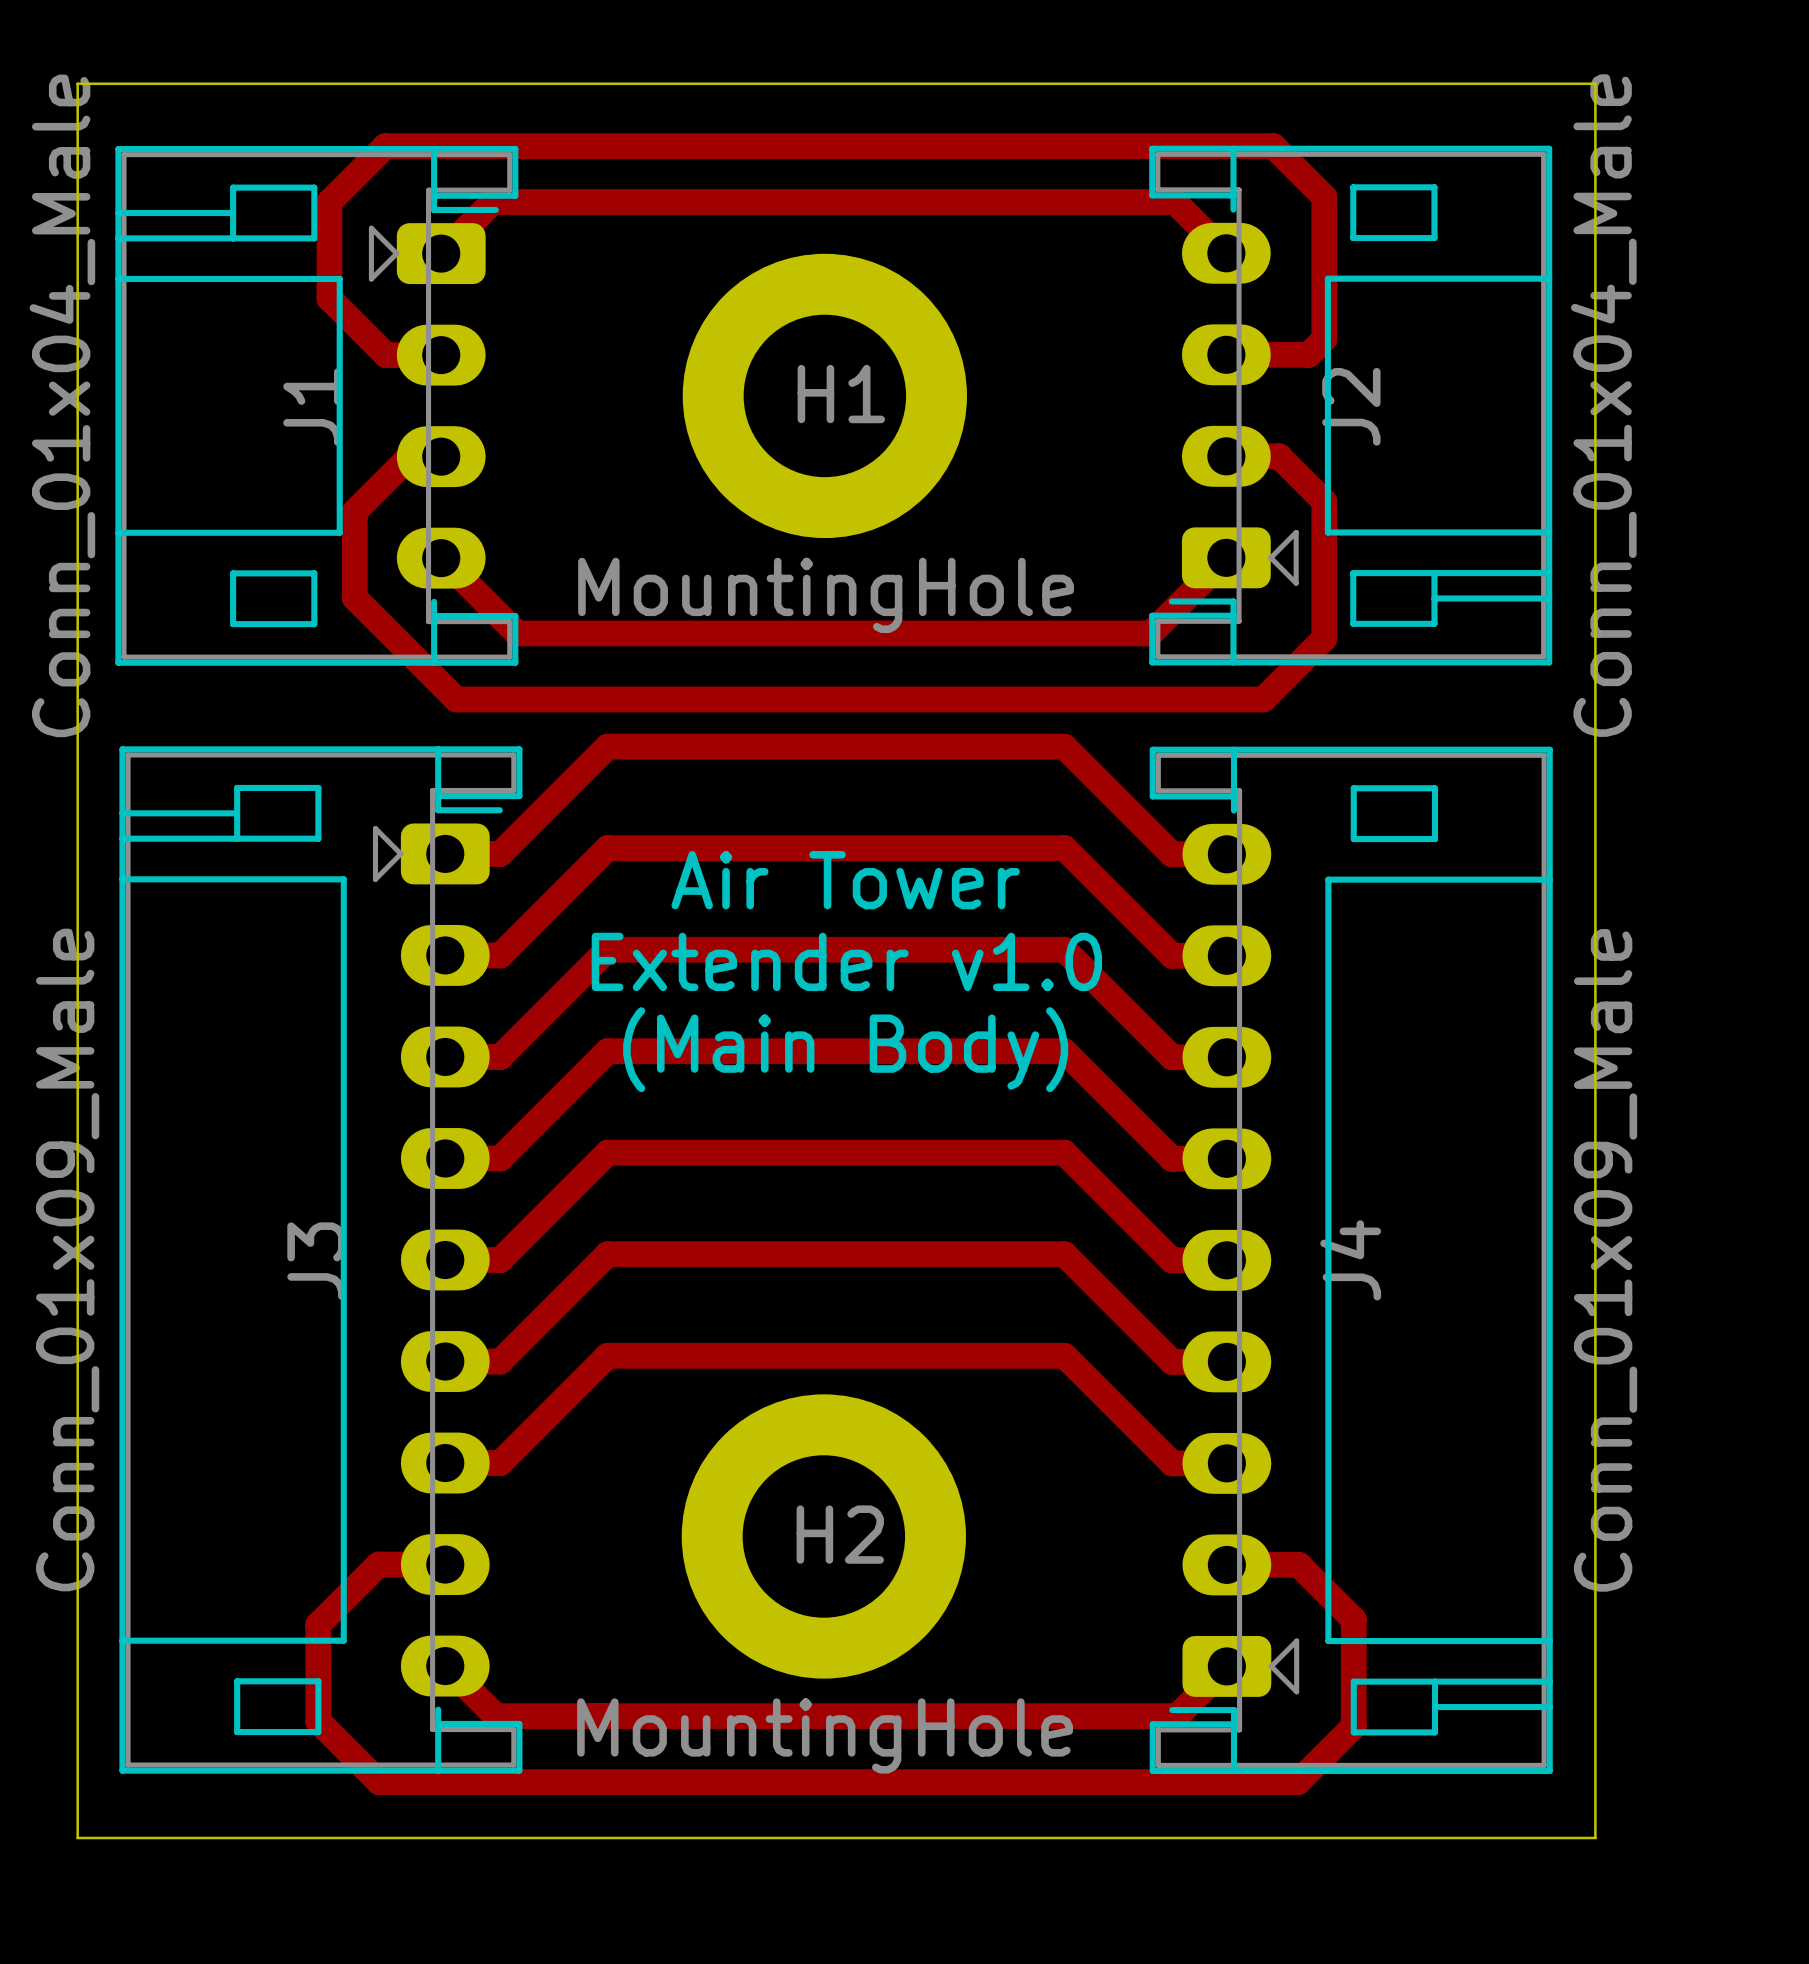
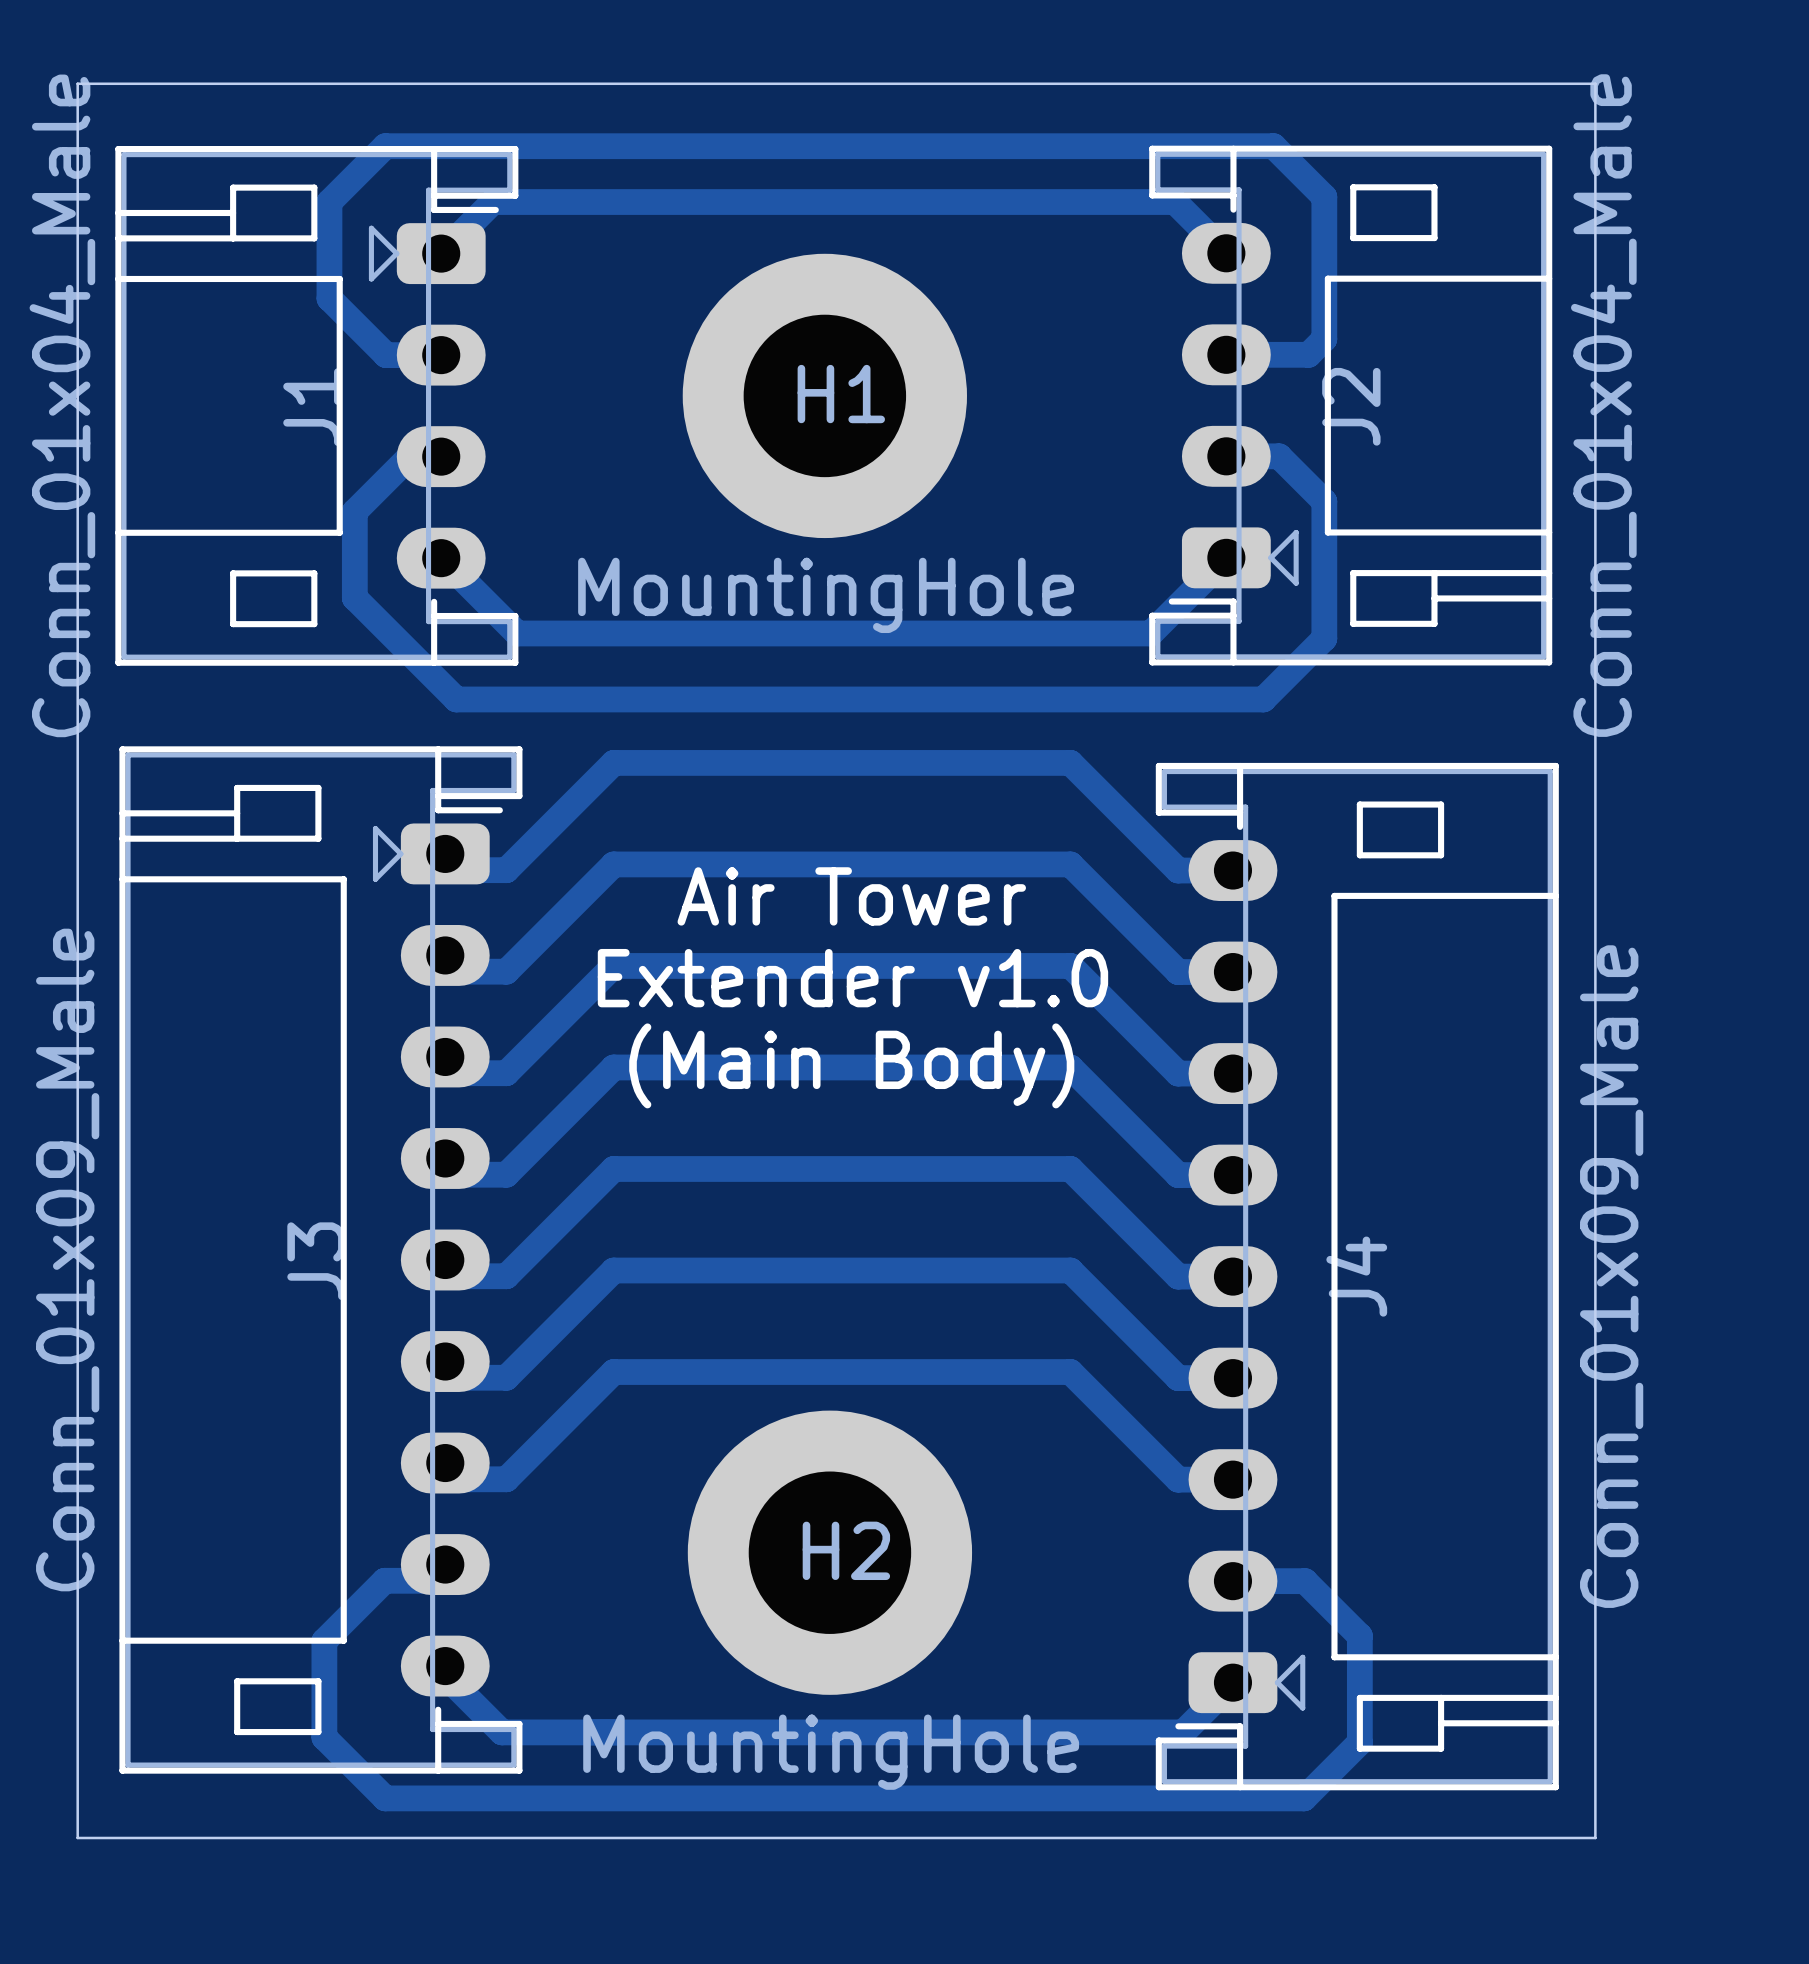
track: (445, 853) (500, 853) (607, 746) (1064, 746) (1172, 854) (1226, 854) -> (451, 870) (506, 870) (613, 762) (1070, 762) (1178, 870) (1232, 870)
text position: Air Tower (845, 880) -> Air Tower (851, 896)
track: (445, 955) (500, 955) (607, 848) (1064, 848) (1172, 955) (1226, 955) -> (451, 971) (506, 971) (613, 864) (1070, 864) (1178, 972) (1232, 972)
text position: Extender v1.0 (846, 961) -> Extender v1.0 (852, 978)
text position: (Main Body) (845, 1049) -> (Main Body) (851, 1065)
track: (445, 1056) (500, 1056) (607, 949) (1064, 949) (1172, 1057) (1226, 1057) -> (451, 1073) (506, 1073) (613, 965) (1070, 965) (1178, 1073) (1232, 1073)
track: (445, 1158) (500, 1158) (607, 1051) (1064, 1051) (1172, 1158) (1226, 1158) -> (451, 1174) (506, 1174) (613, 1067) (1070, 1067) (1178, 1175) (1232, 1175)
track: (445, 1260) (500, 1260) (607, 1152) (1064, 1152) (1172, 1260) (1226, 1260) -> (451, 1276) (506, 1276) (613, 1168) (1070, 1168) (1178, 1276) (1232, 1276)
J4 position: (1351, 1260) -> (1357, 1276)
track: (445, 1361) (500, 1361) (607, 1254) (1064, 1254) (1172, 1361) (1226, 1361) -> (451, 1377) (506, 1377) (613, 1270) (1070, 1270) (1178, 1378) (1232, 1378)
track: (445, 1463) (500, 1463) (607, 1355) (1064, 1355) (1172, 1463) (1226, 1463) -> (451, 1479) (506, 1479) (613, 1372) (1070, 1372) (1178, 1479) (1232, 1479)
H2 position: (823, 1536) -> (829, 1552)
track: (445, 1564) (378, 1564) (318, 1624) (318, 1721) (379, 1782) (1297, 1782) (1353, 1726) (1353, 1619) (1298, 1564) (1226, 1564) -> (451, 1580) (384, 1580) (324, 1641) (324, 1737) (385, 1798) (1304, 1798) (1359, 1742) (1359, 1635) (1305, 1581) (1232, 1581)
track: (445, 1666) (495, 1716) (1177, 1716) (1226, 1666) -> (451, 1682) (502, 1732) (1183, 1732) (1232, 1682)

